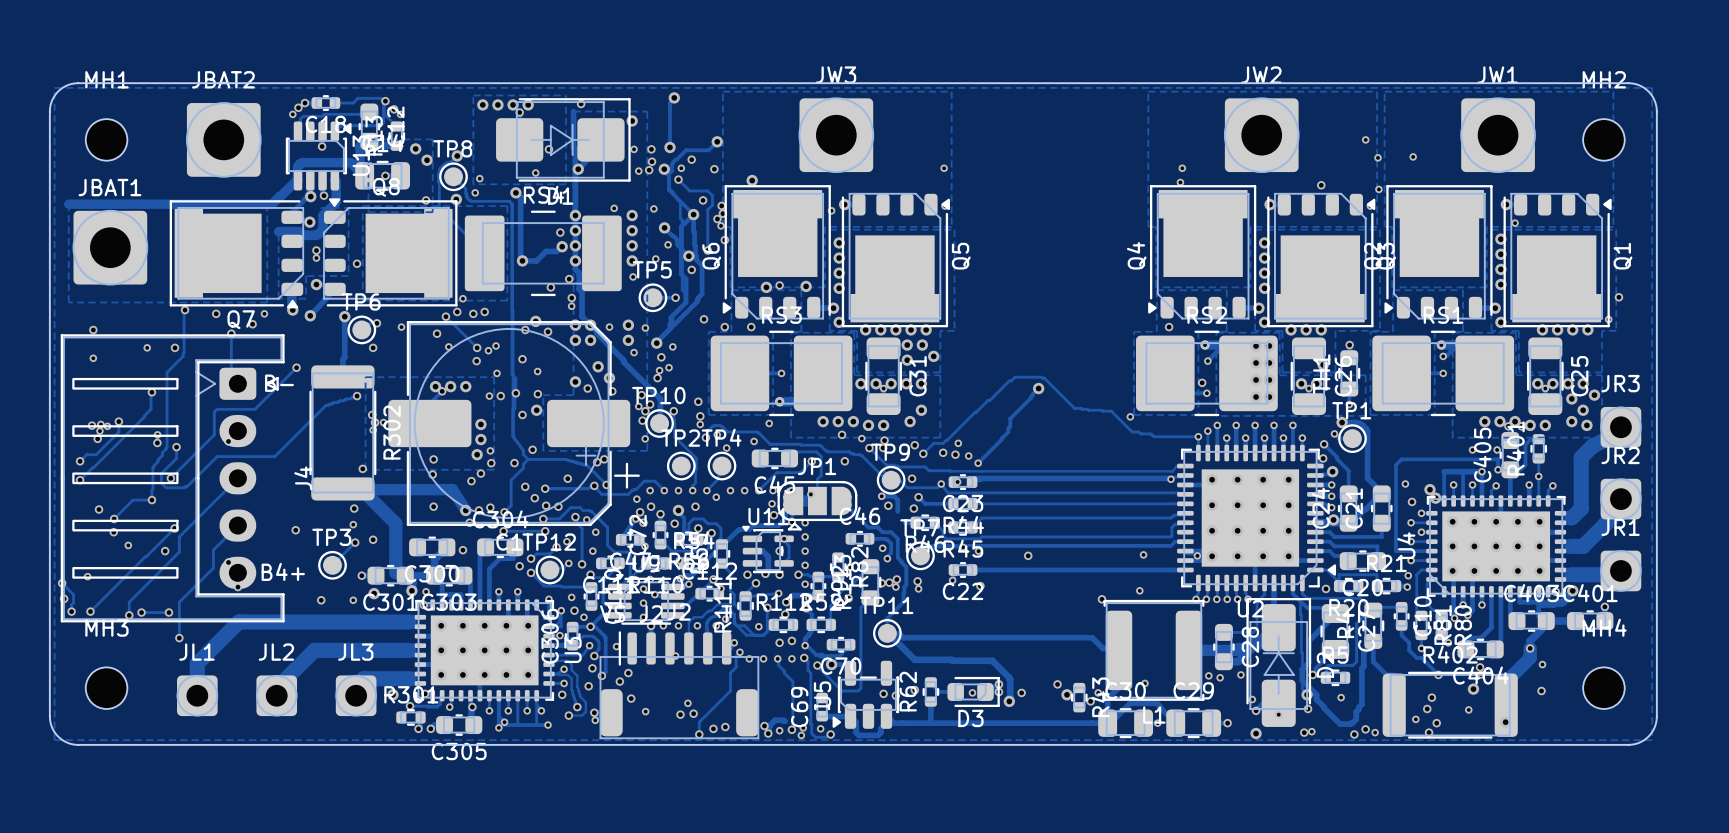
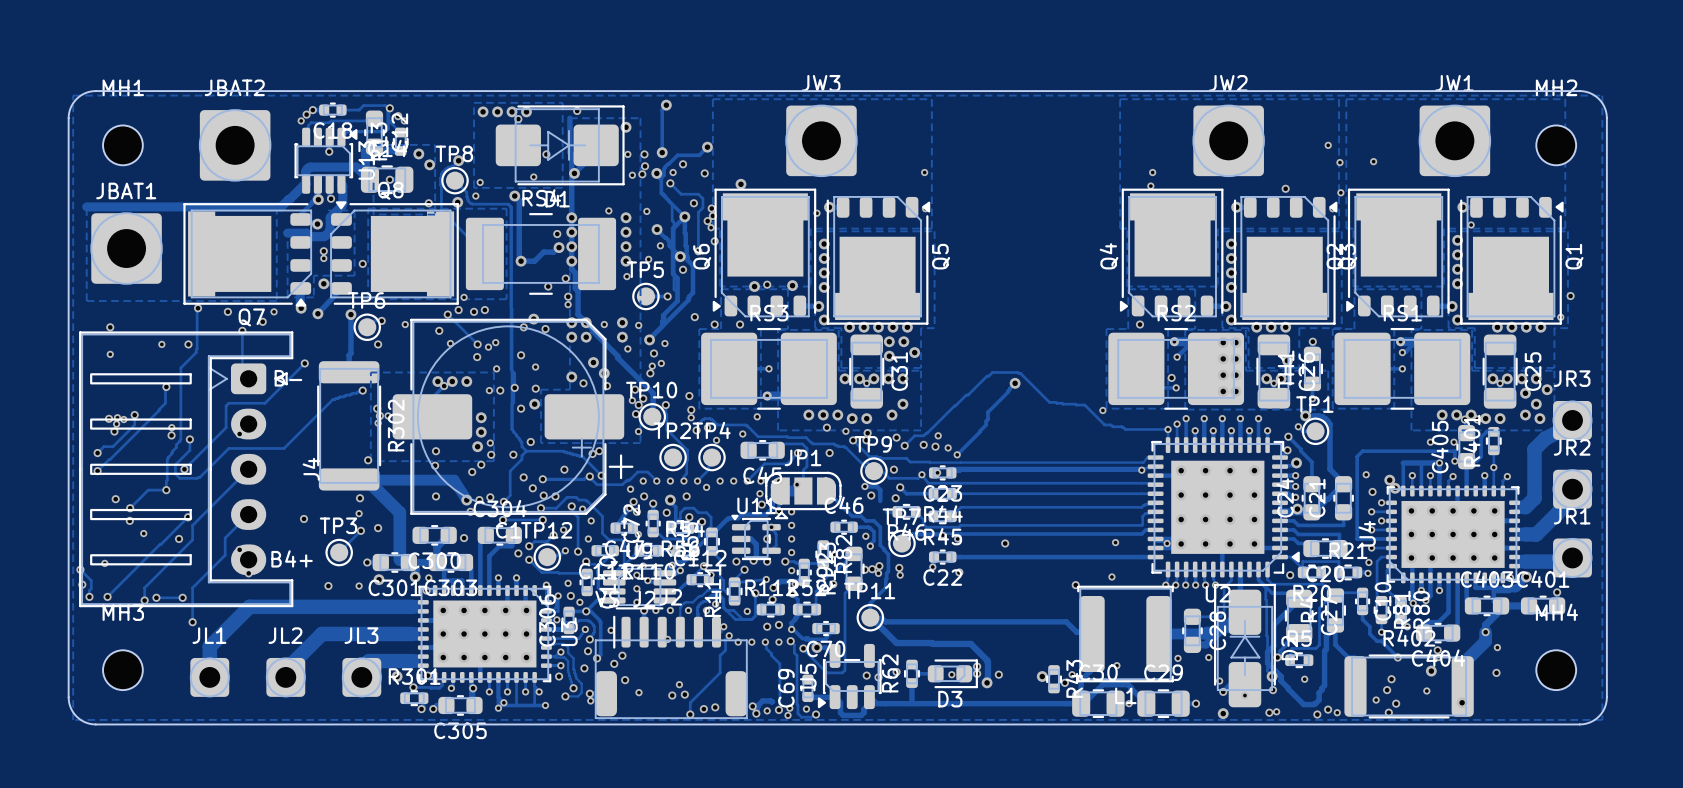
via: (1220, 677) -> none
via: (1057, 684) -> none

